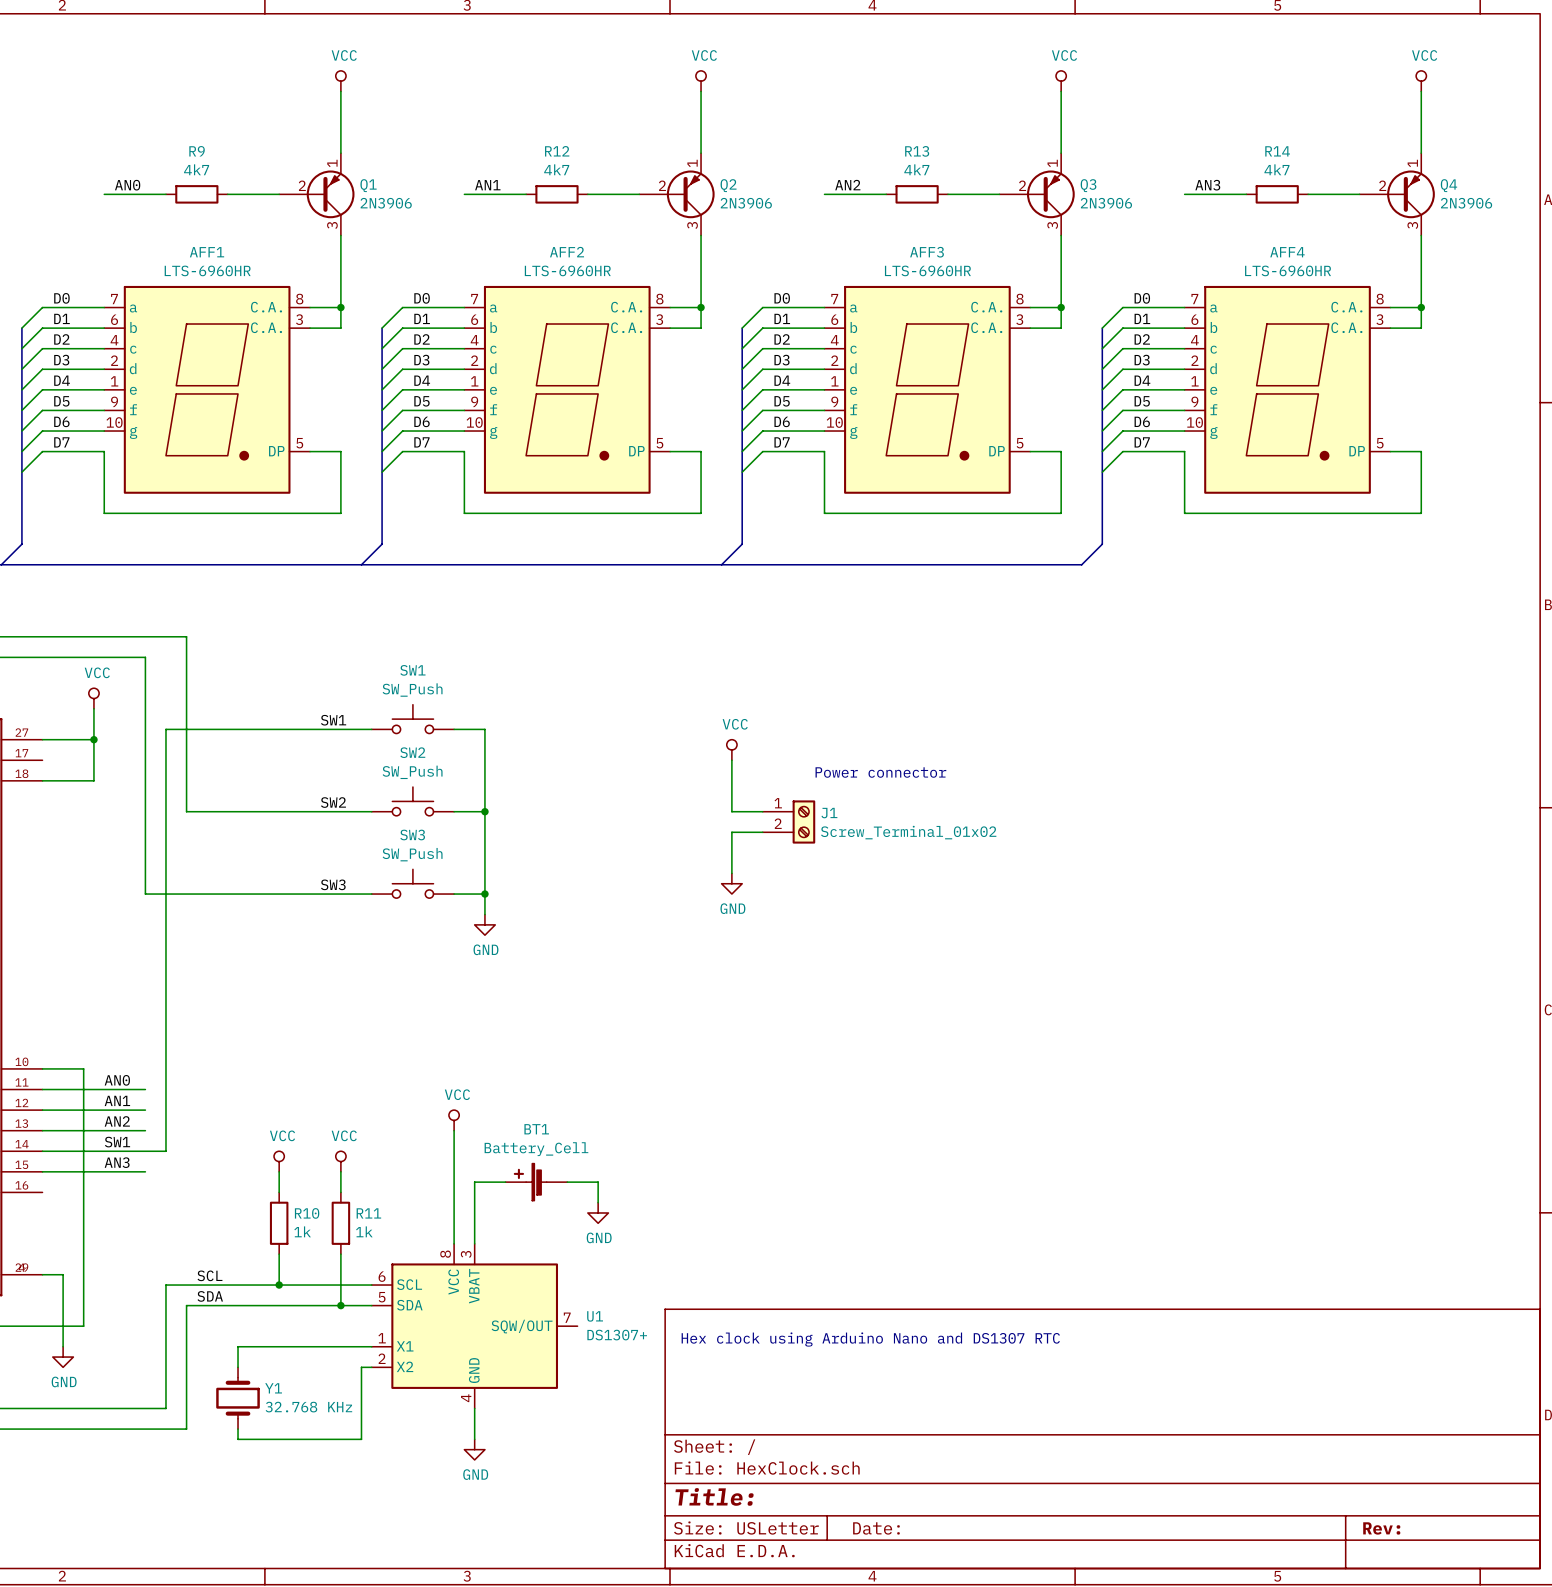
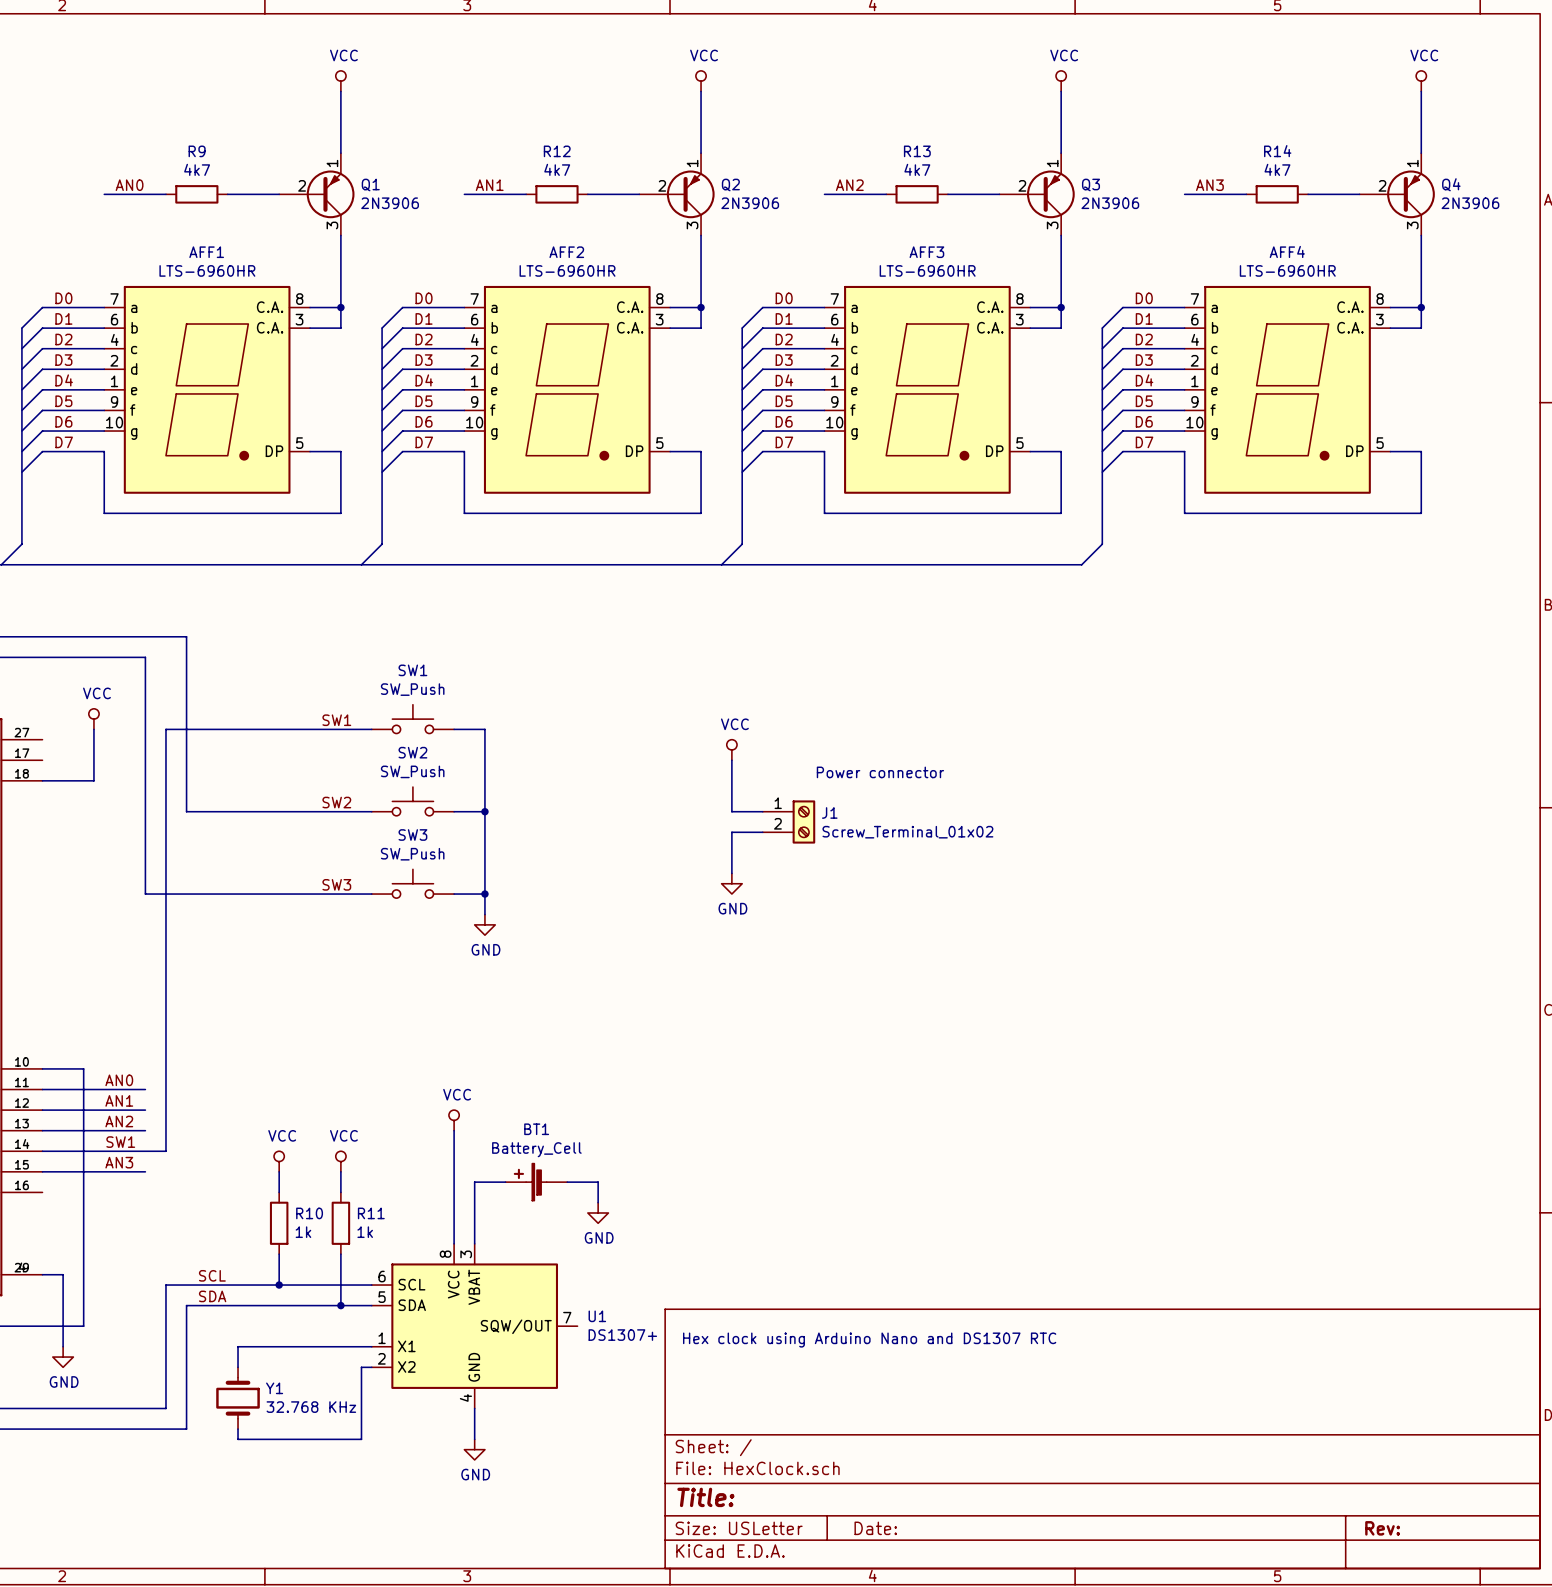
power symbol position: VCC (93, 698) -> VCC (93, 719)
wire: (42, 739) (93, 739) -> none
junction: (93, 739) -> none

